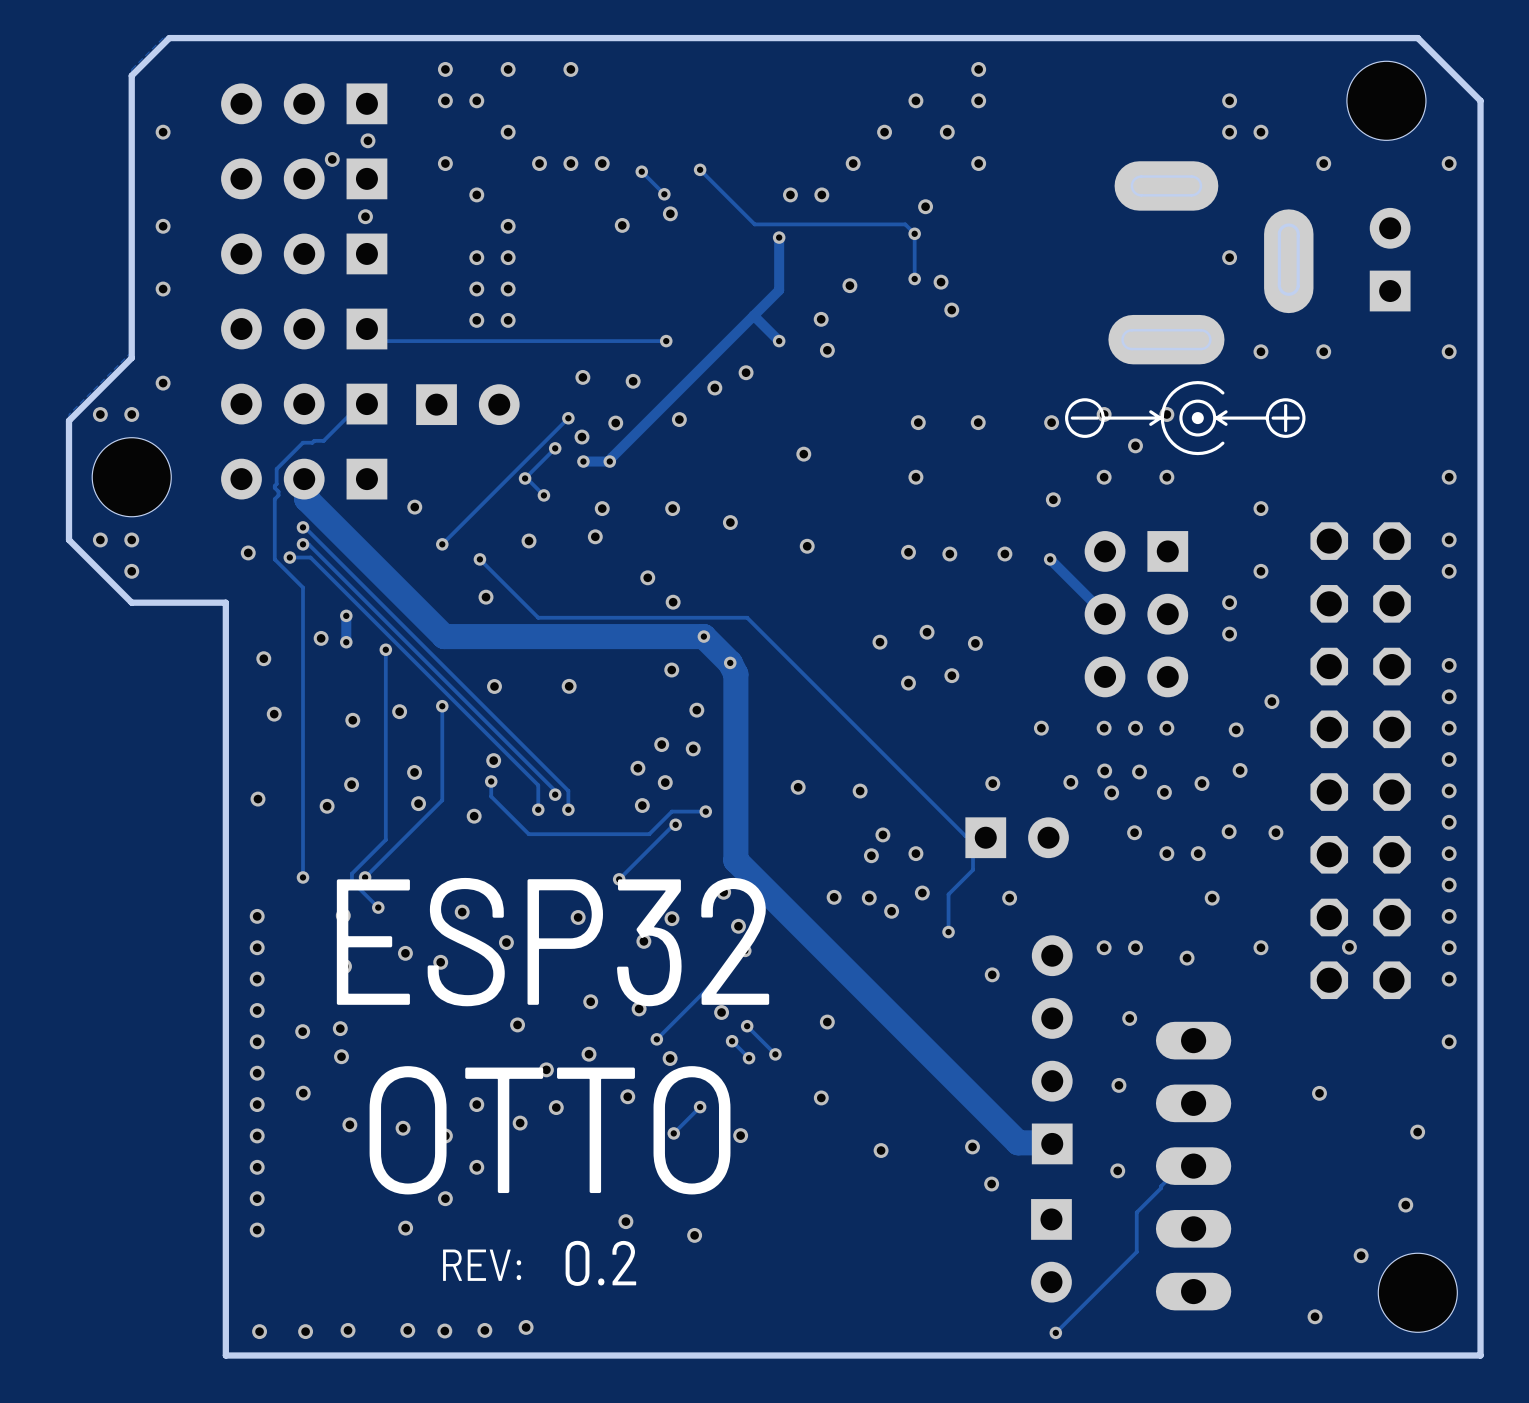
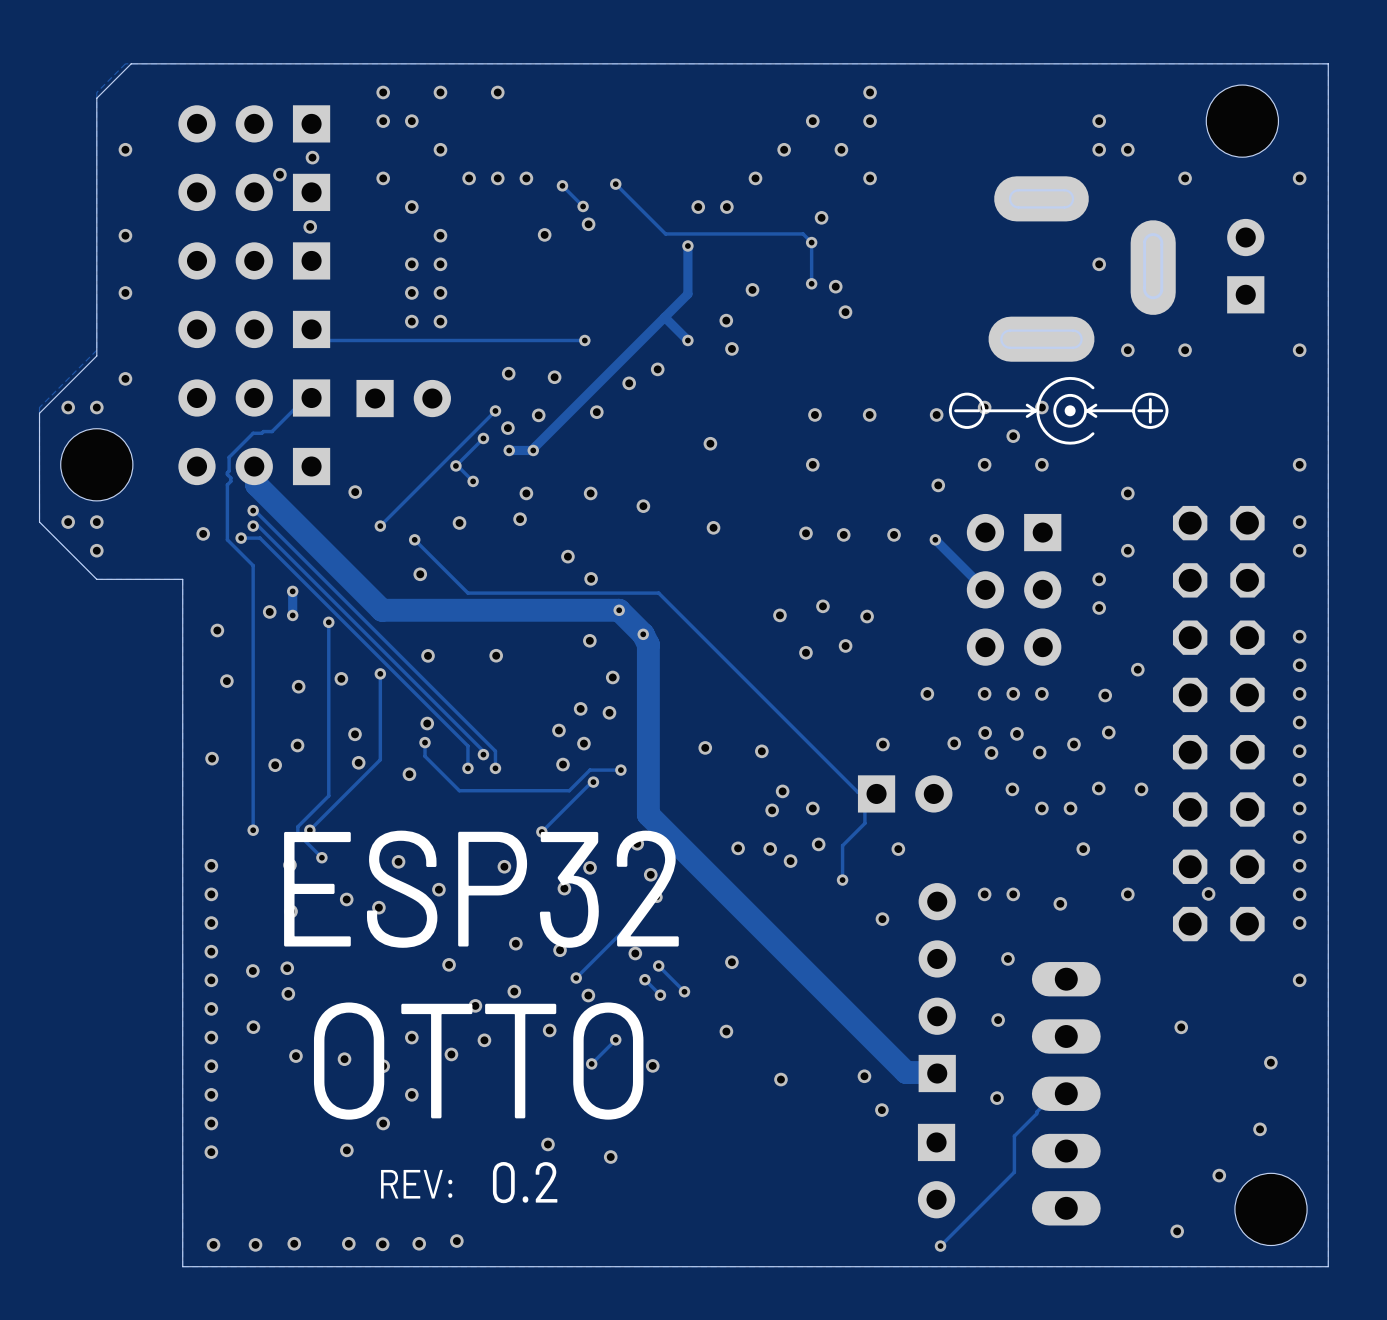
part footprint: [69, 38, 1481, 1356] -> [39, 63, 1329, 1267]
board edge: (1417, 38) (169, 38) (131, 75) (131, 358) (69, 420) (69, 539) (131, 602) (225, 602) (225, 1355) (1480, 1355) (1480, 100) (1417, 38) -> none

